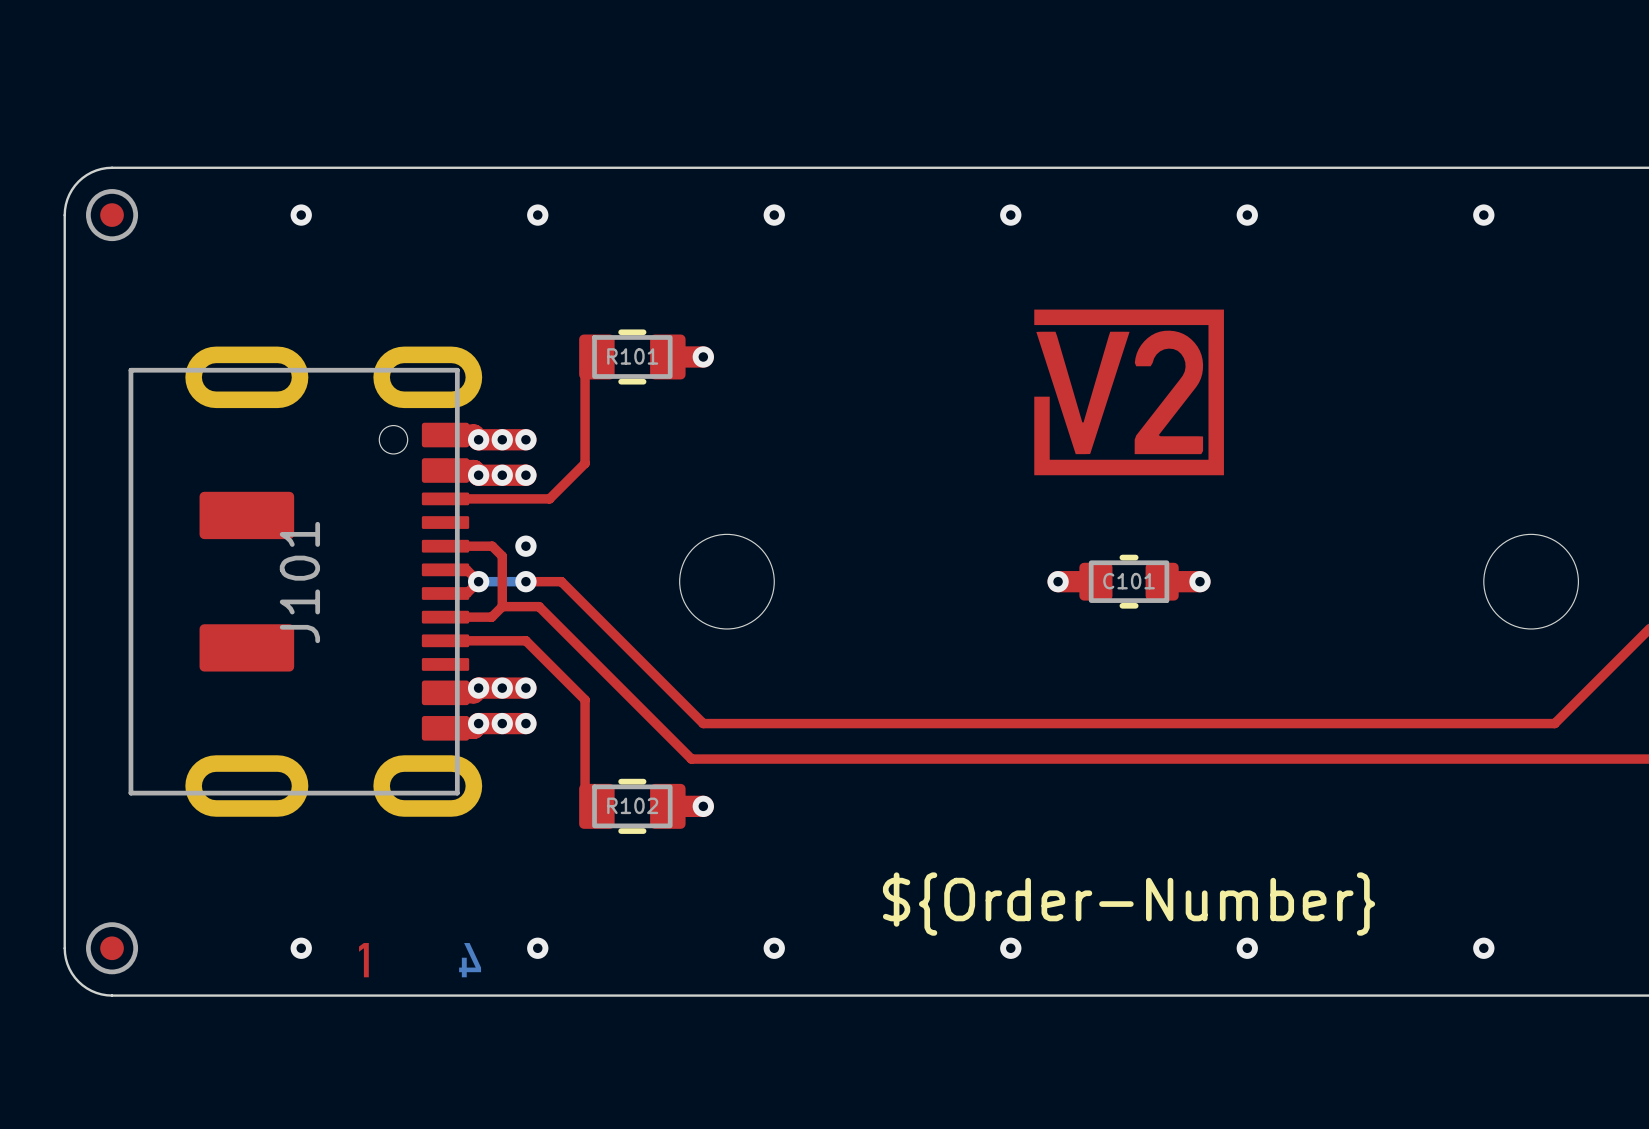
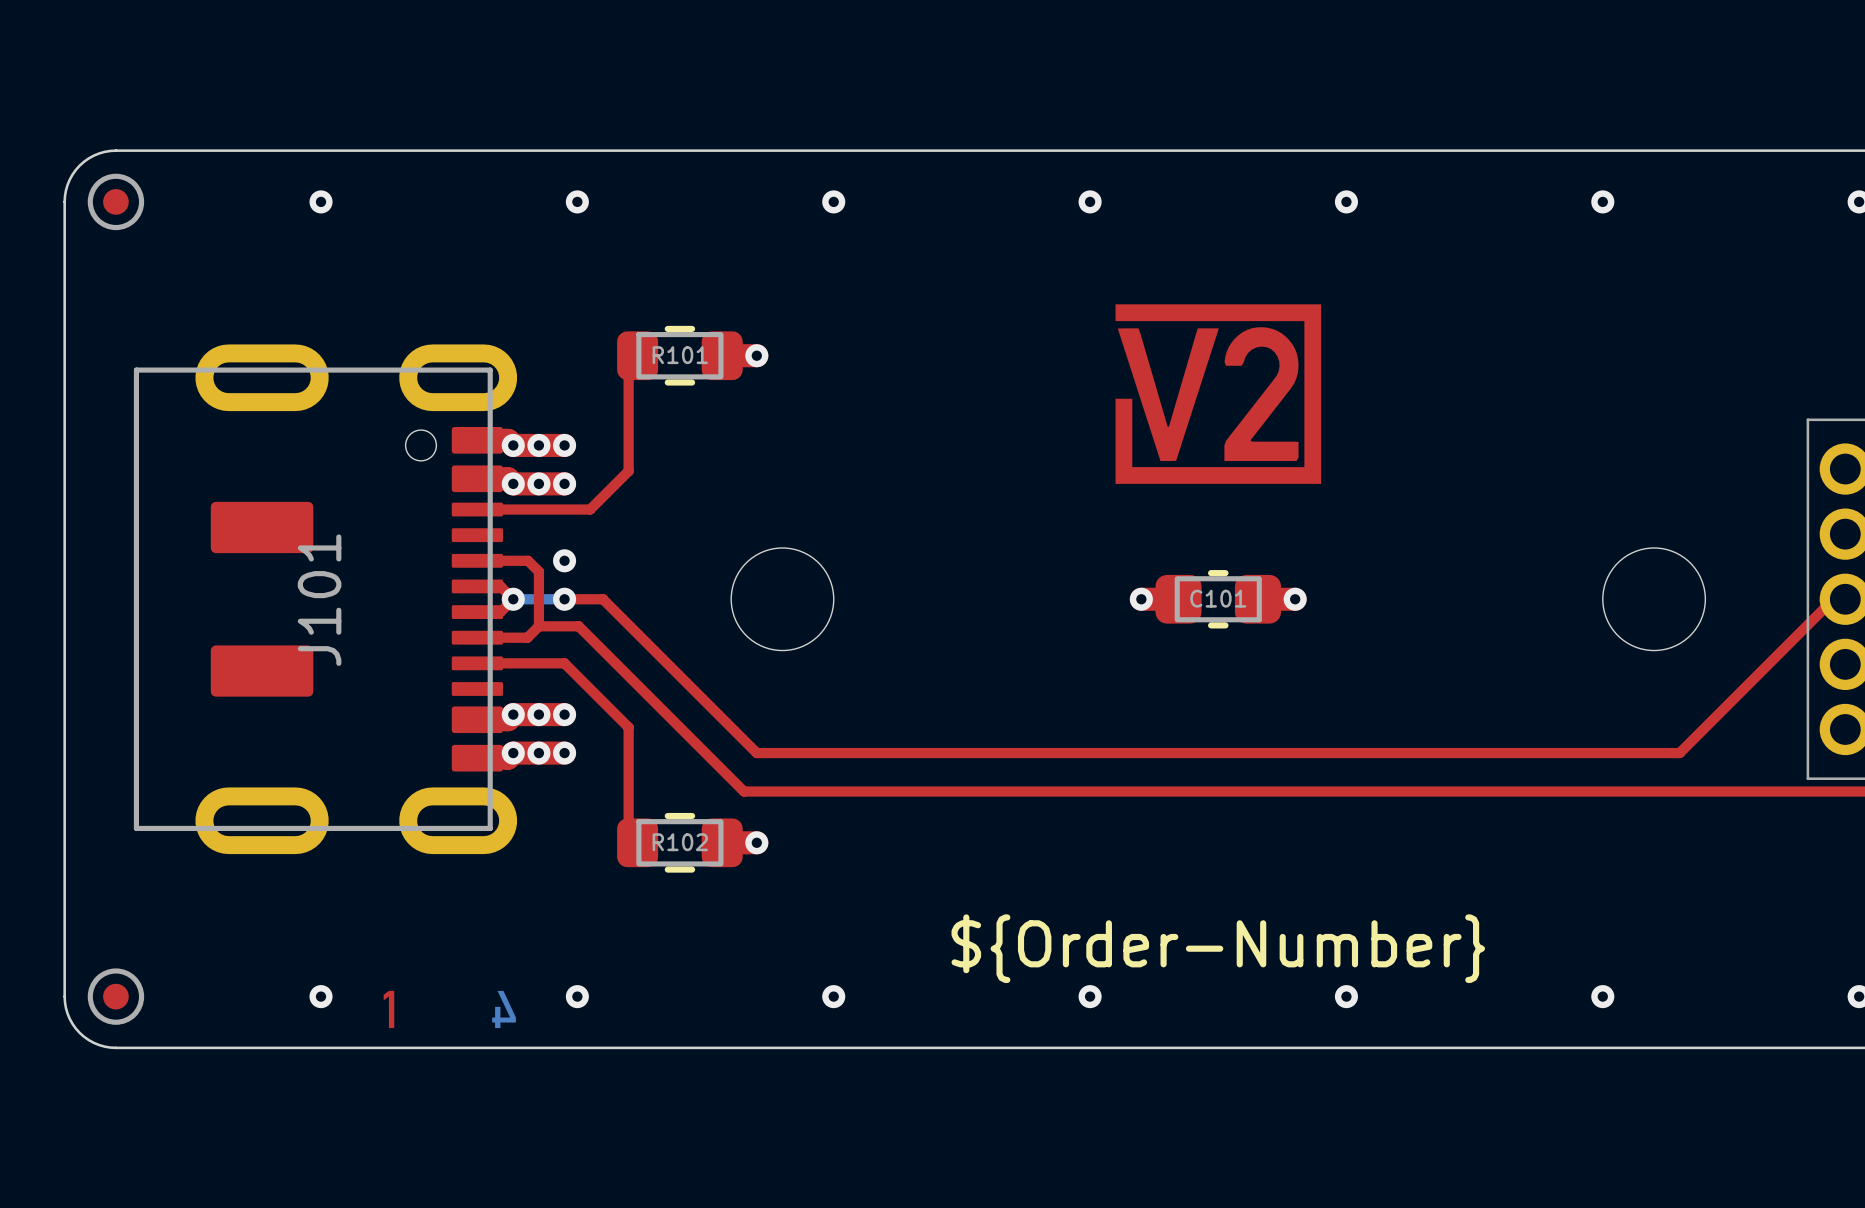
R101 footprint: [579, 329, 686, 385] -> [617, 325, 743, 386]
C101 footprint: [1079, 554, 1179, 609] -> [1155, 570, 1282, 629]
R102 footprint: [579, 778, 686, 834] -> [617, 812, 743, 873]

